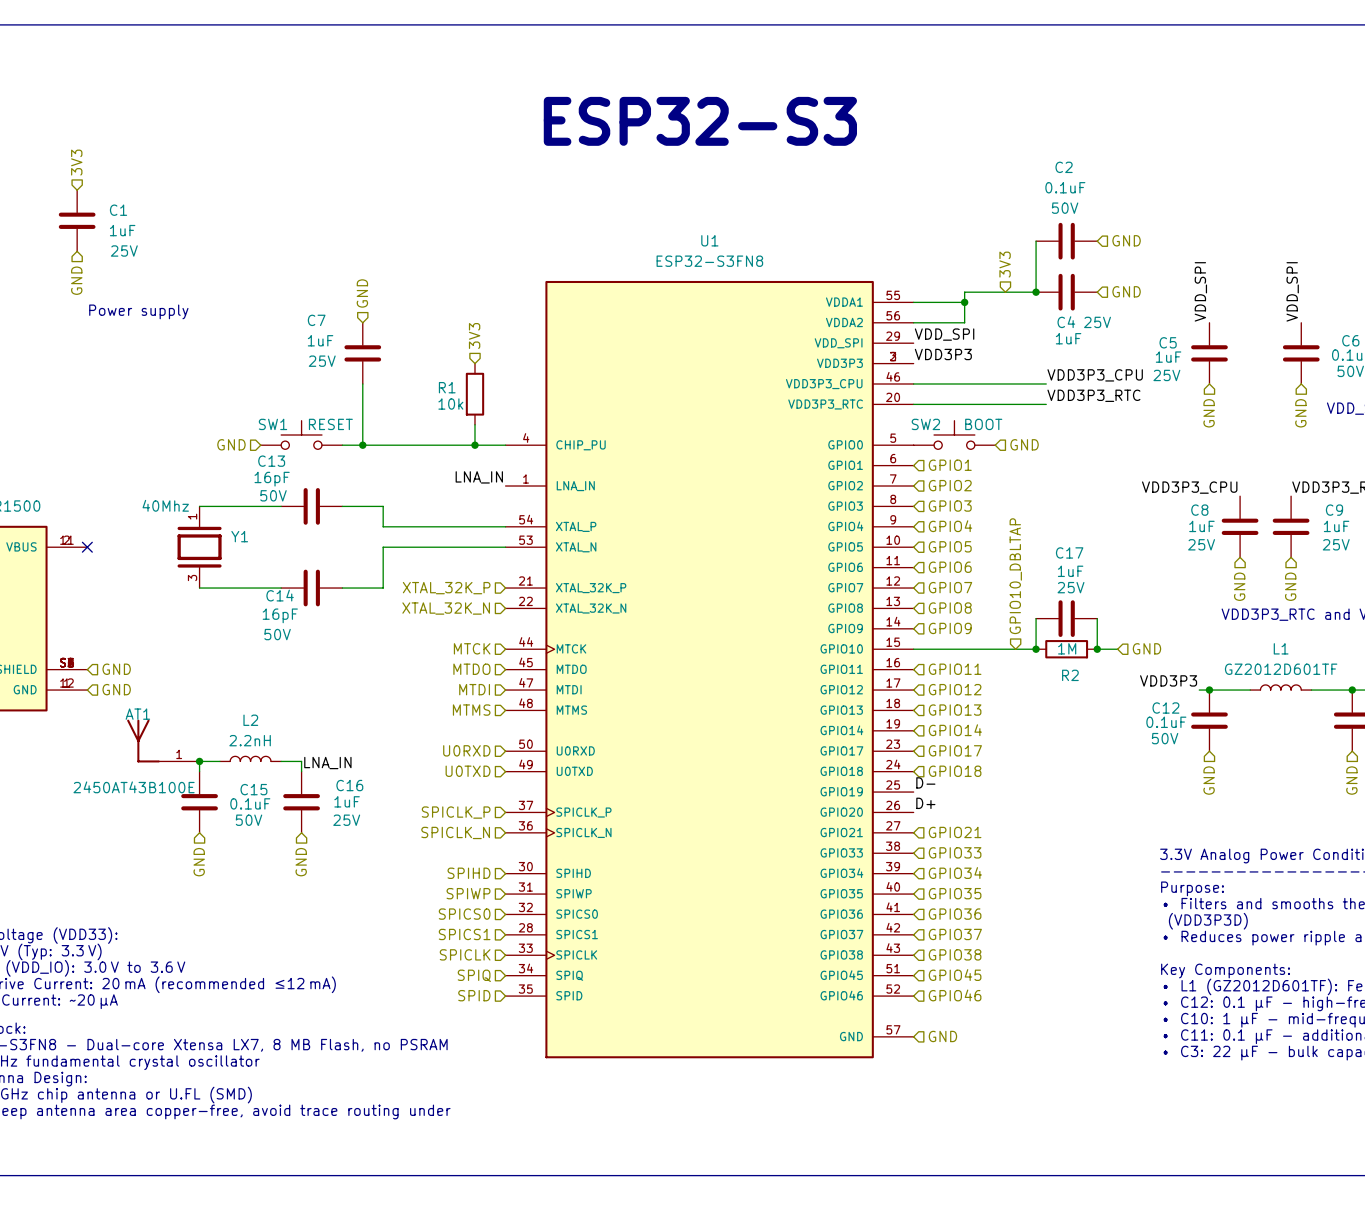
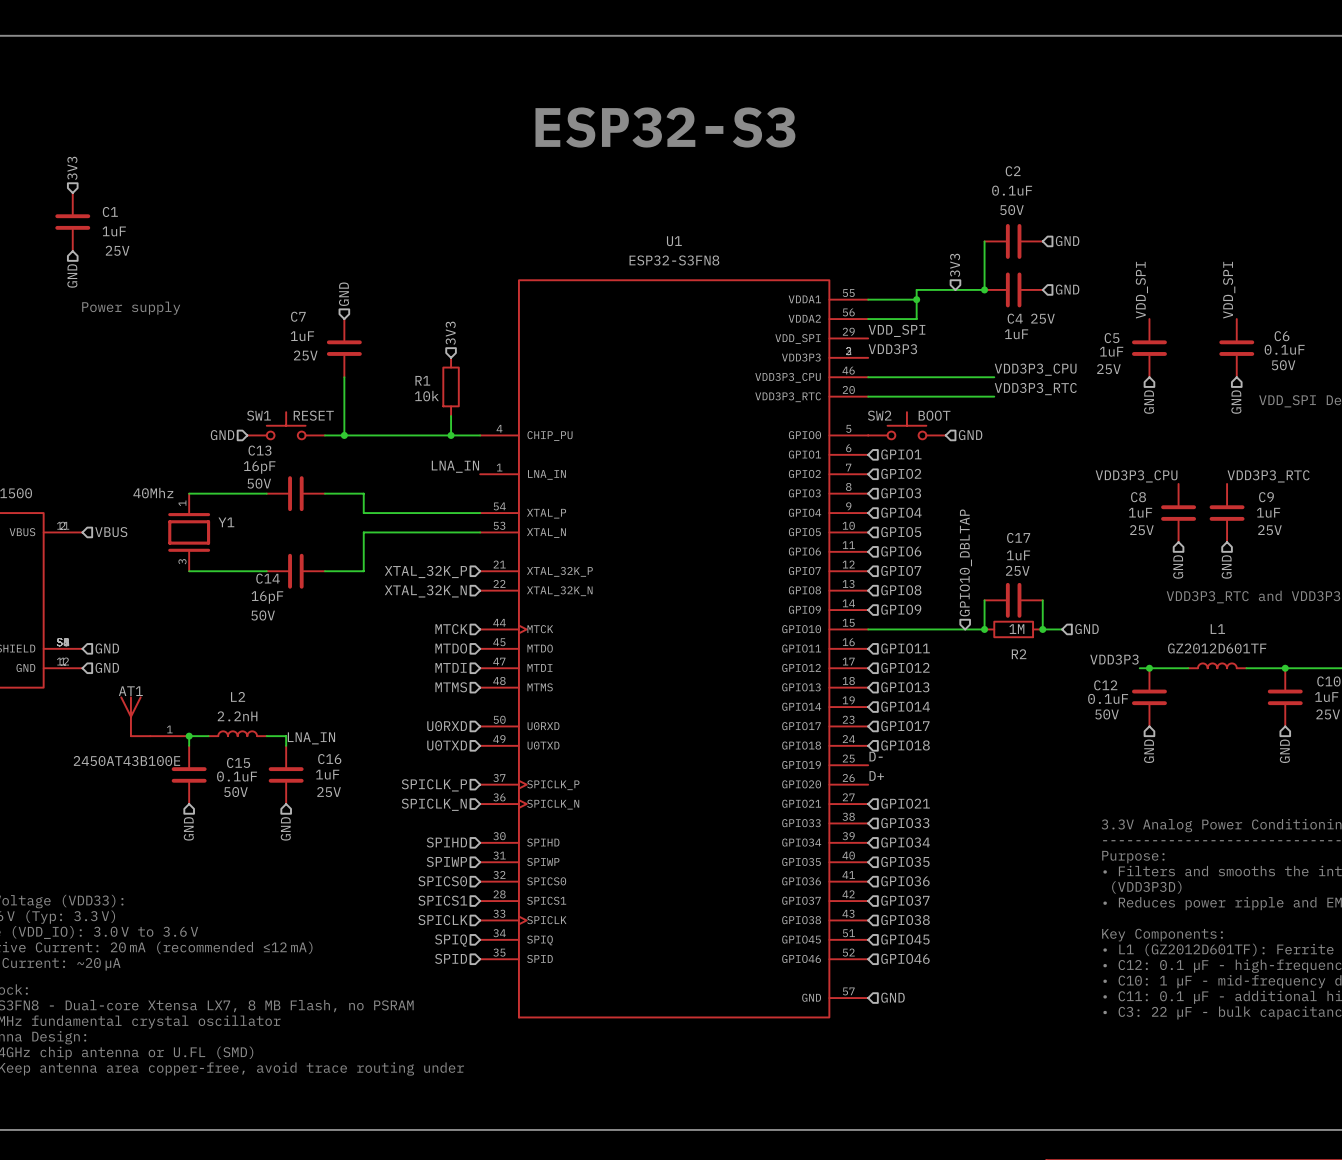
hierarchical label: none -> VBUS (111, 532)
no-connect mark: (87, 547) -> none

